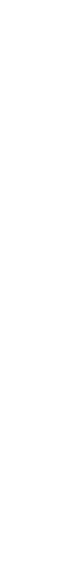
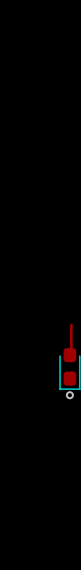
track: none -> (71, 324) (71, 348)
part: none -> (69, 369)
via: none -> (69, 395)

